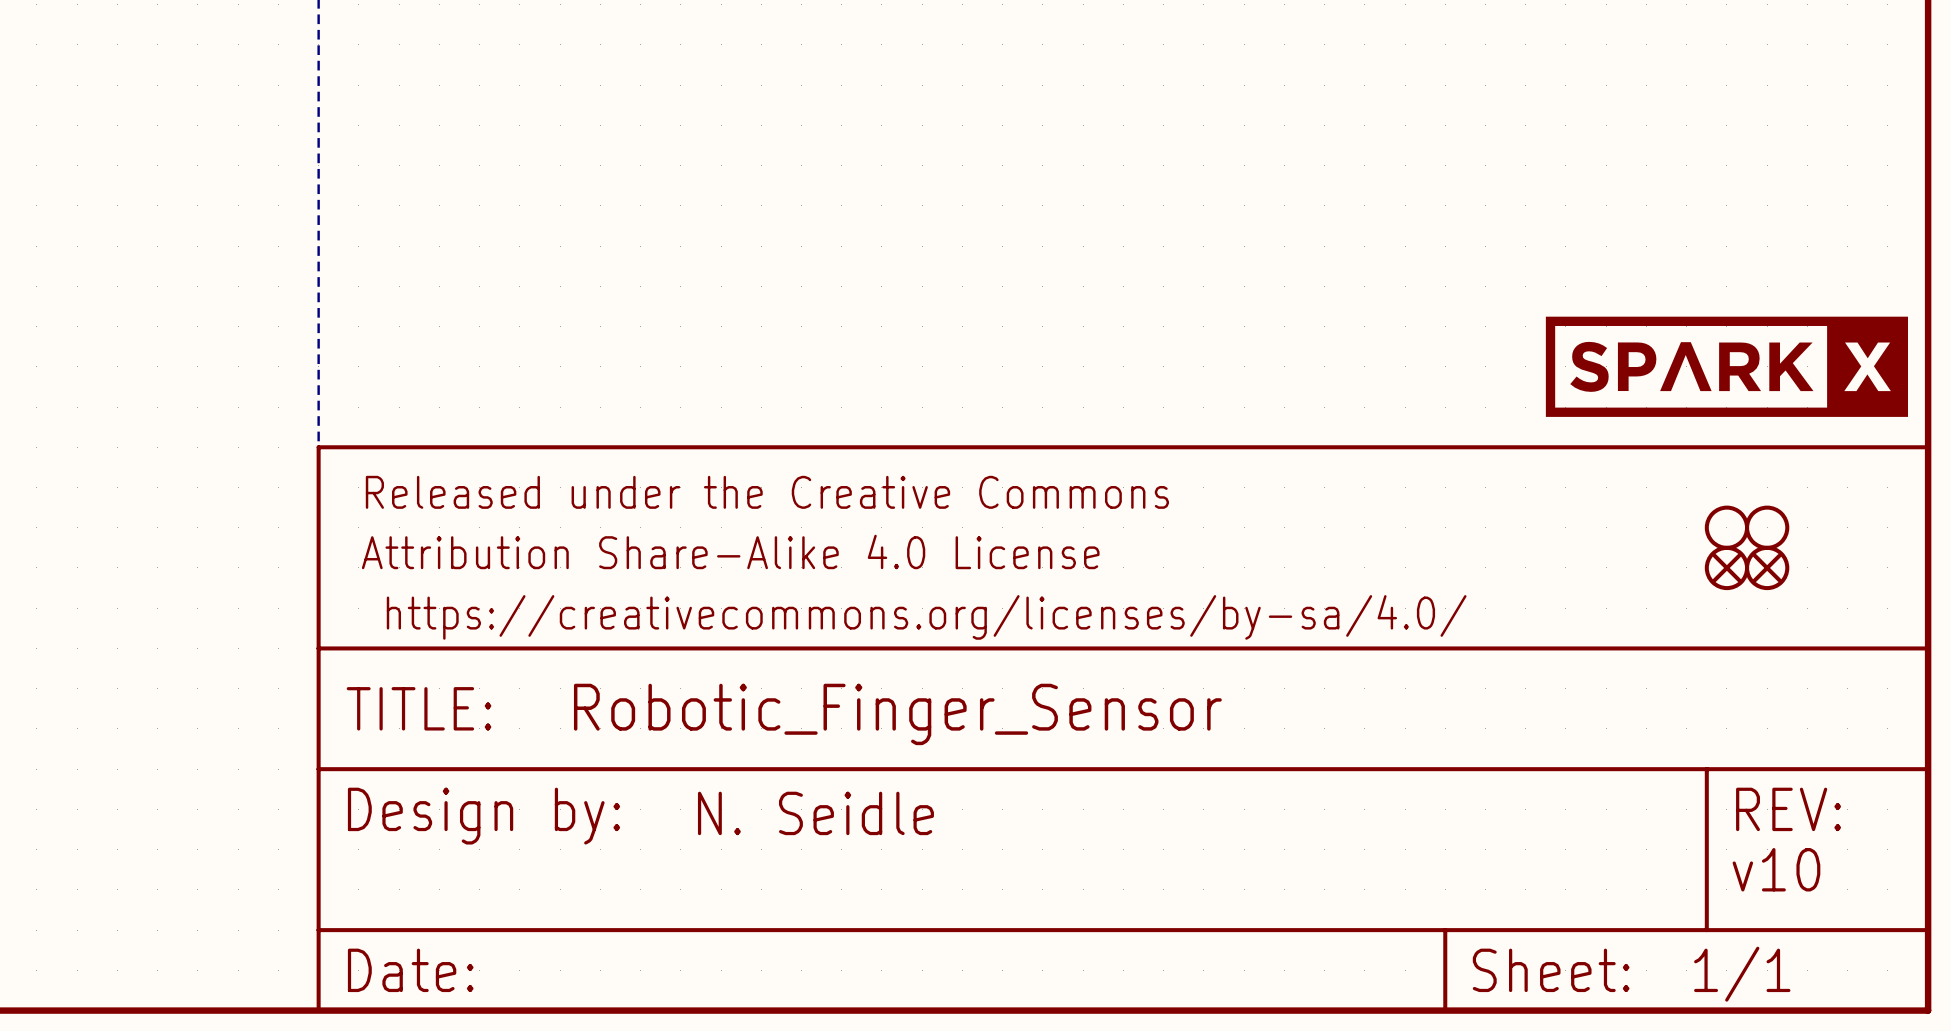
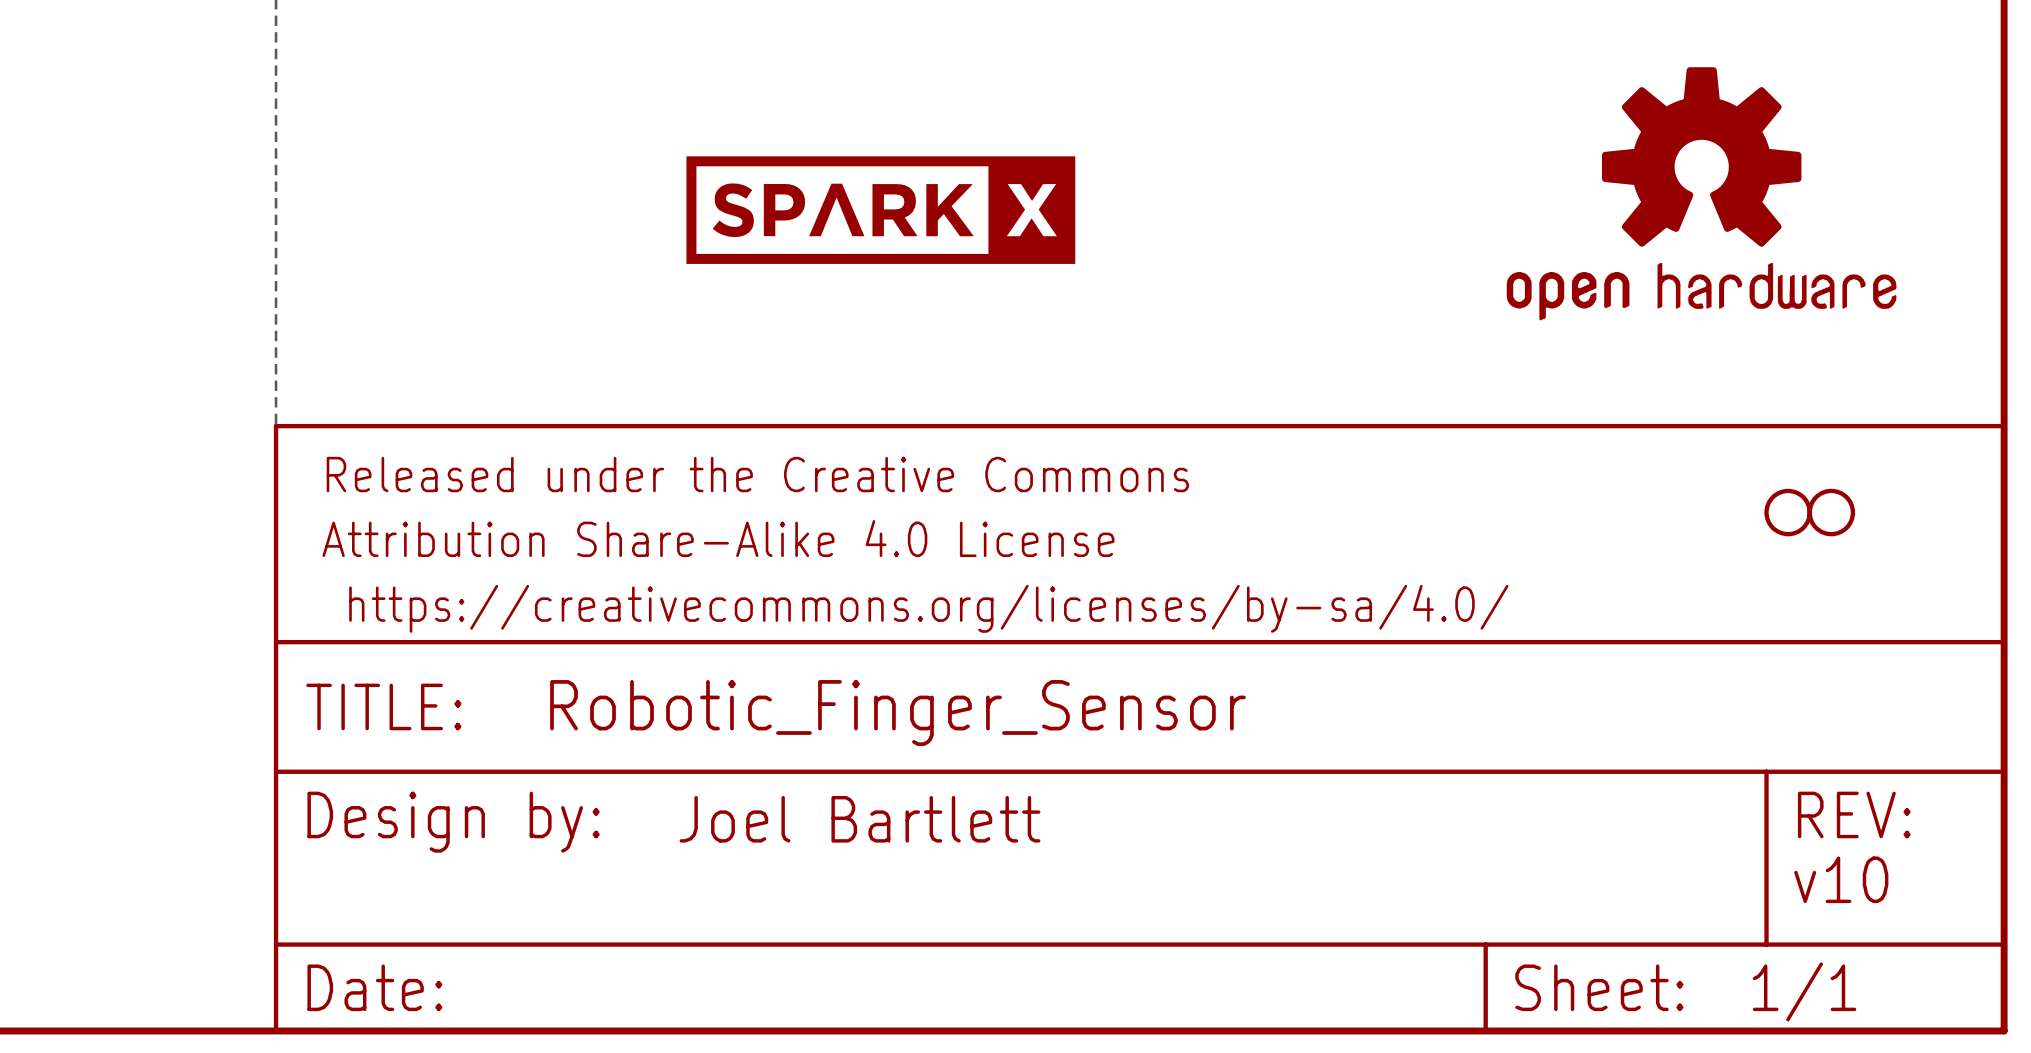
part: none -> (1701, 193)
part: none -> (880, 210)
part: (1726, 366) -> none
part: (1726, 567) -> none
part: (1767, 567) -> none
text: N. Seidle (815, 813) -> Joel Bartlett (859, 819)

